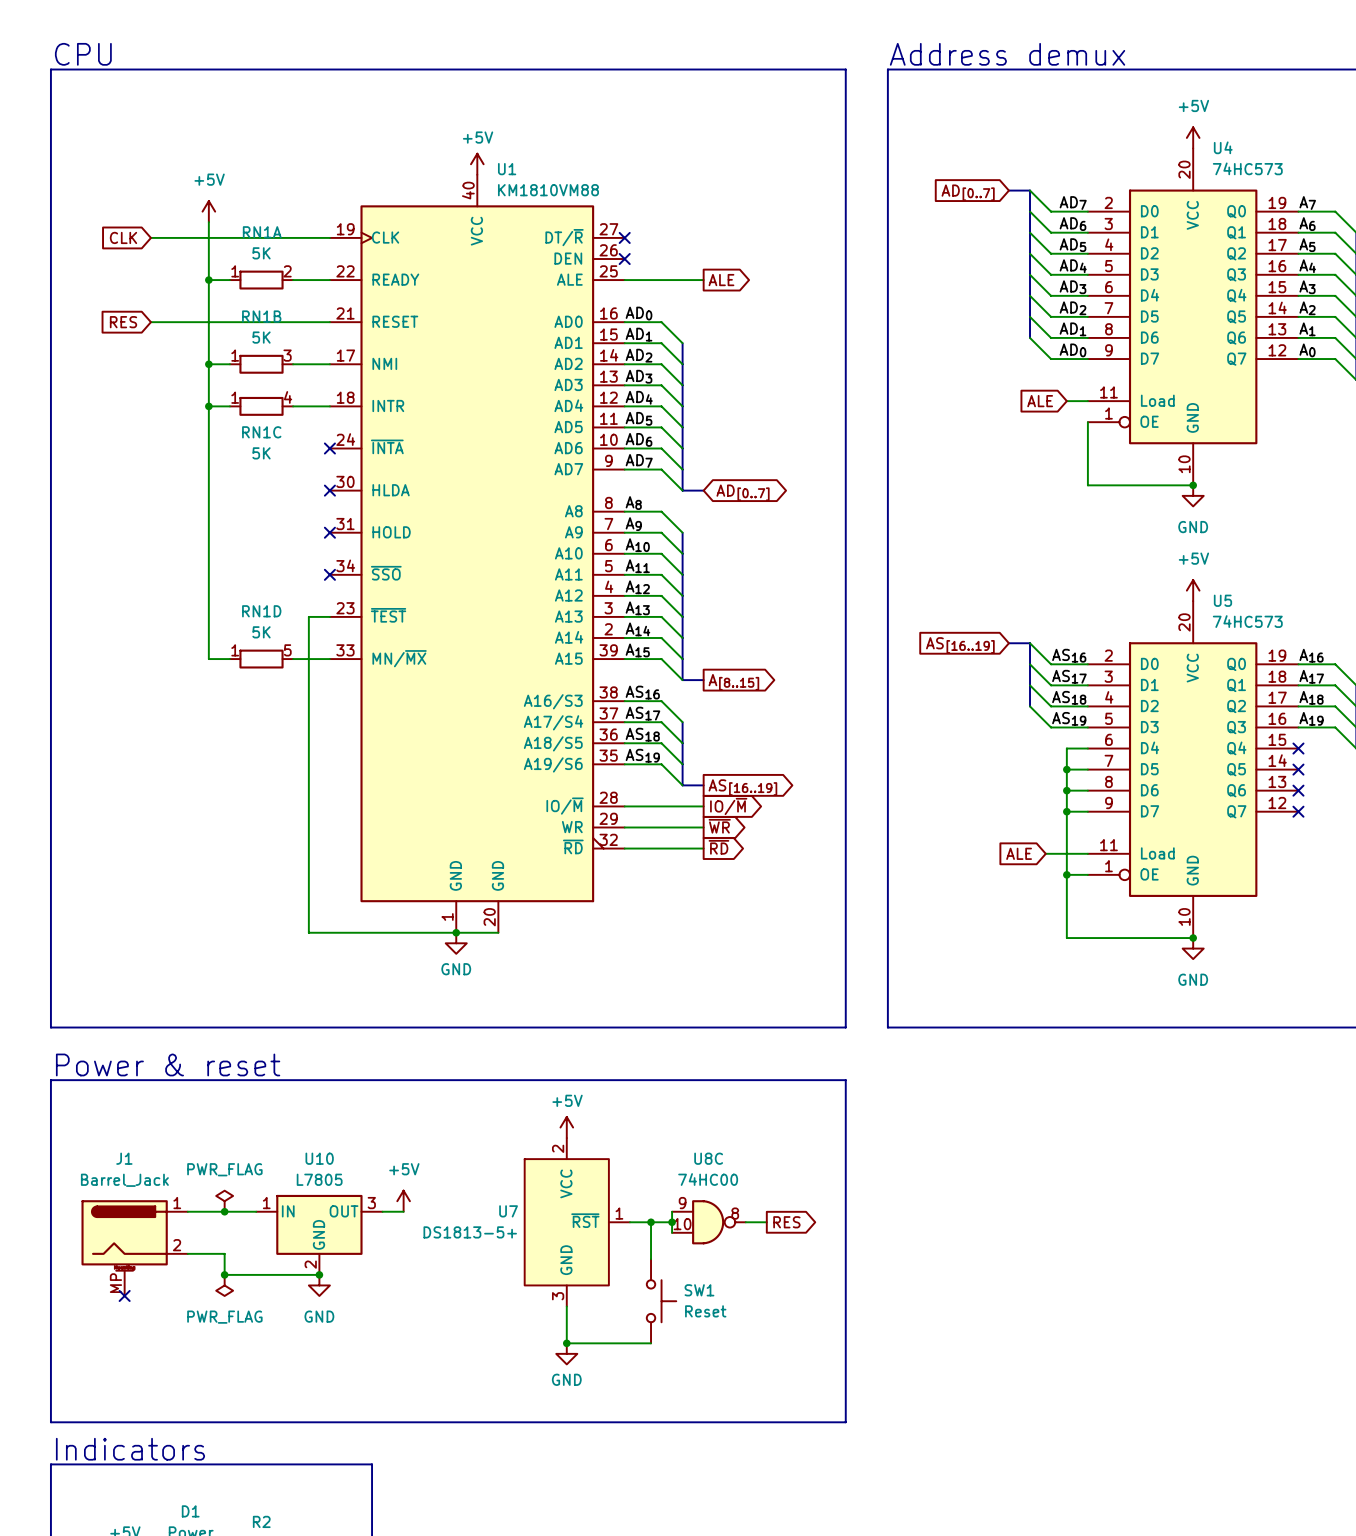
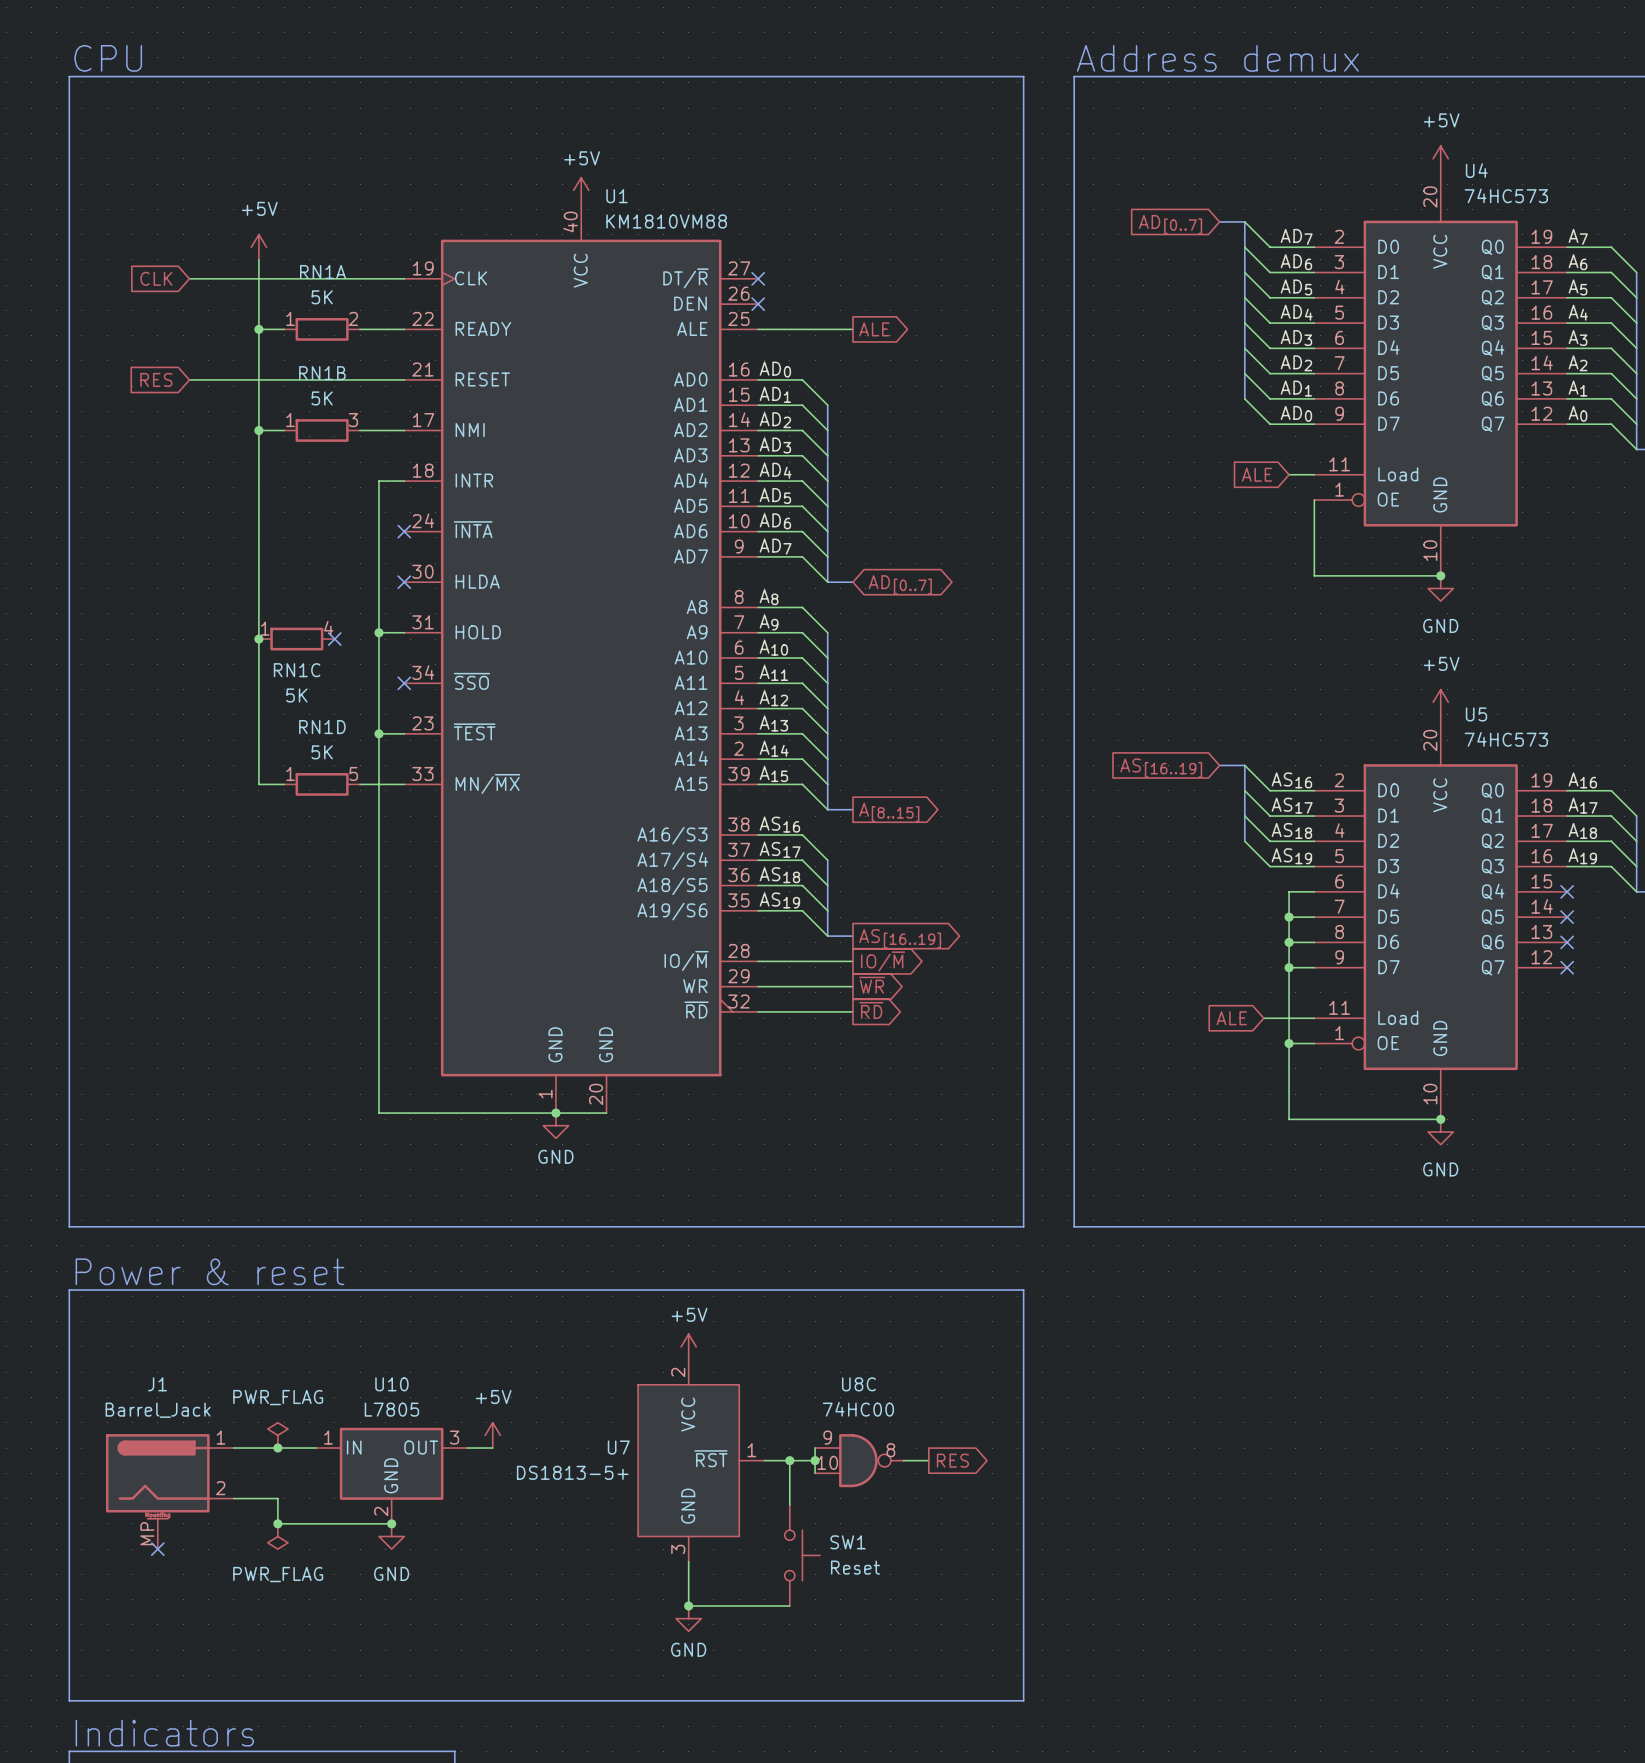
wire: (208, 406) (229, 406) -> (378, 632) (404, 632)
junction: (208, 406) -> none
RN1C position: (261, 406) -> (296, 639)
wire: (293, 406) (308, 406) -> (378, 733) (378, 481)
junction: none -> (378, 632)
no-connect mark: (329, 532) -> none
junction: none -> (258, 639)
no-connect mark: none -> (334, 639)
junction: none -> (378, 733)

